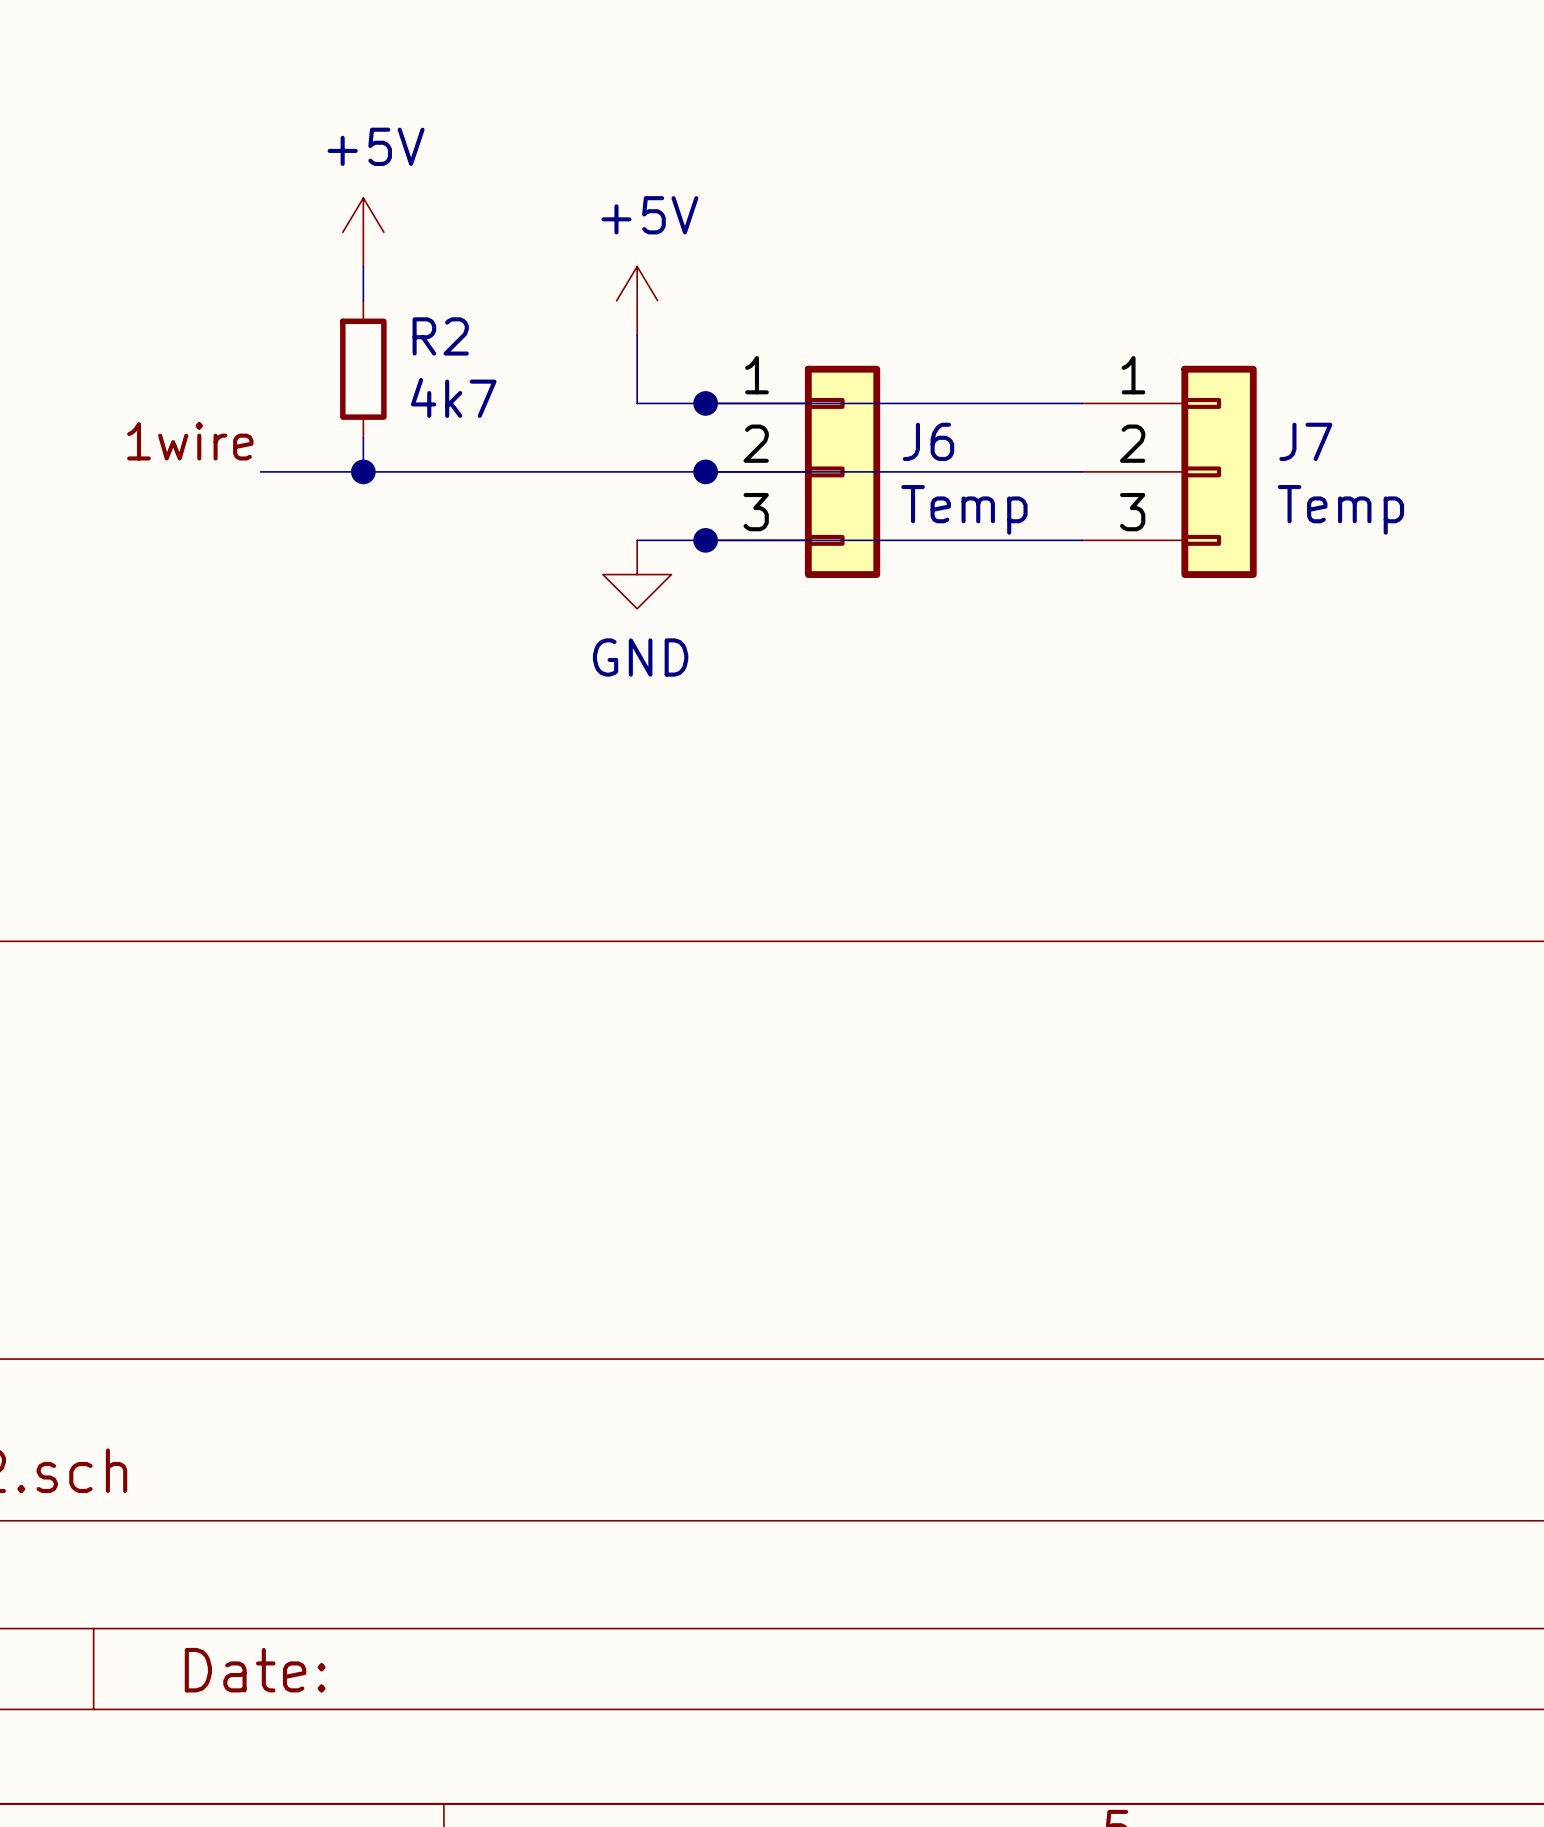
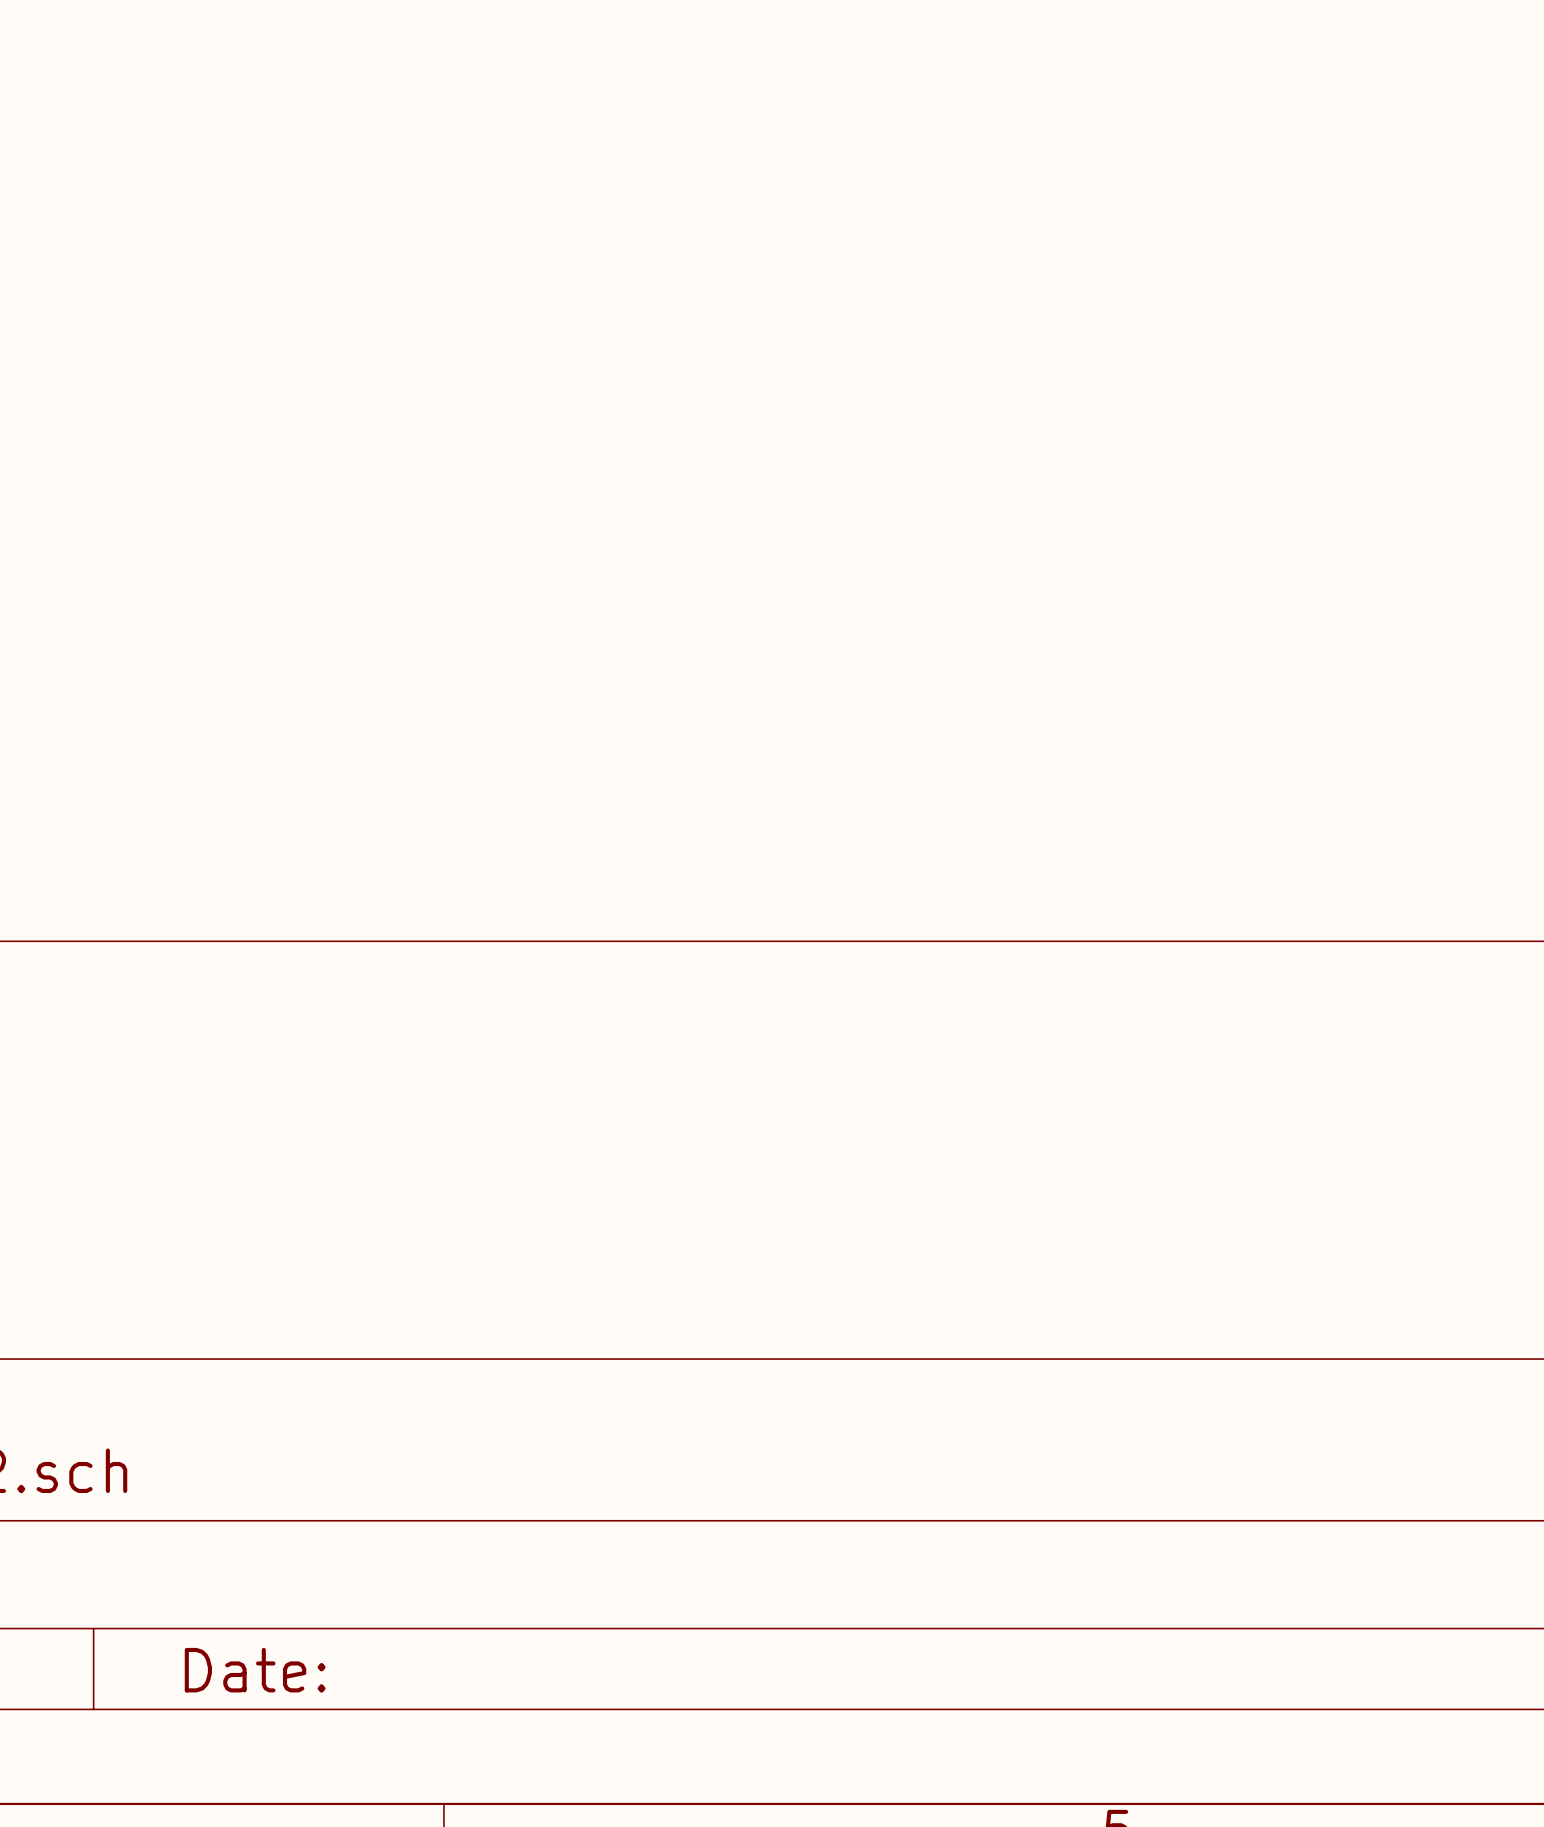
power symbol: +5V (363, 232) -> none
wire: (363, 266) (363, 300) -> none
power symbol: +5V (637, 300) -> none
wire: (637, 334) (637, 403) (1082, 403) -> none
R2: 4k7 (363, 369) -> none
junction: (705, 403) -> none
wire: (363, 437) (363, 471) -> none
label: 1wire (190, 441) -> none
wire: (260, 471) (1082, 471) -> none
junction: (363, 471) -> none
junction: (705, 471) -> none
J6: Temp (792, 471) -> none
J7: Temp (1169, 471) -> none
wire: (637, 540) (1082, 540) -> none
junction: (705, 540) -> none
power symbol: GND (637, 574) -> none

